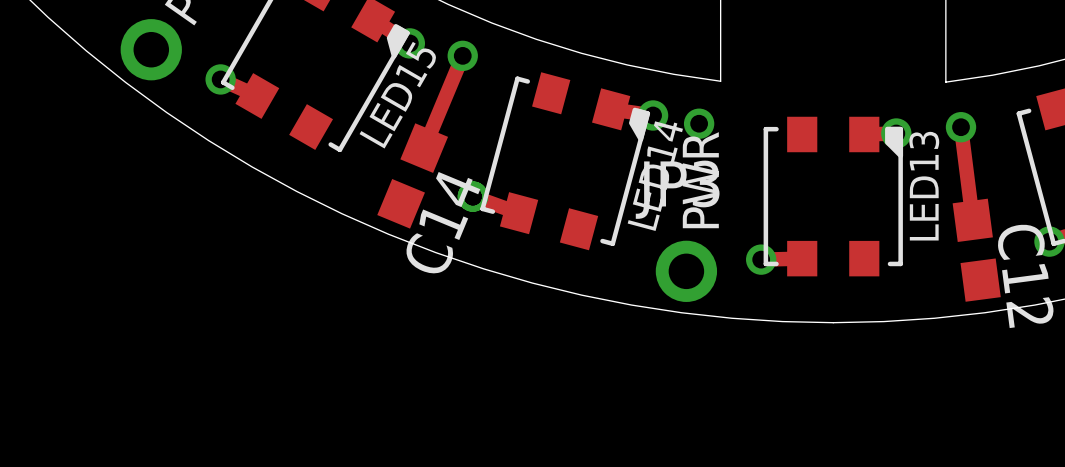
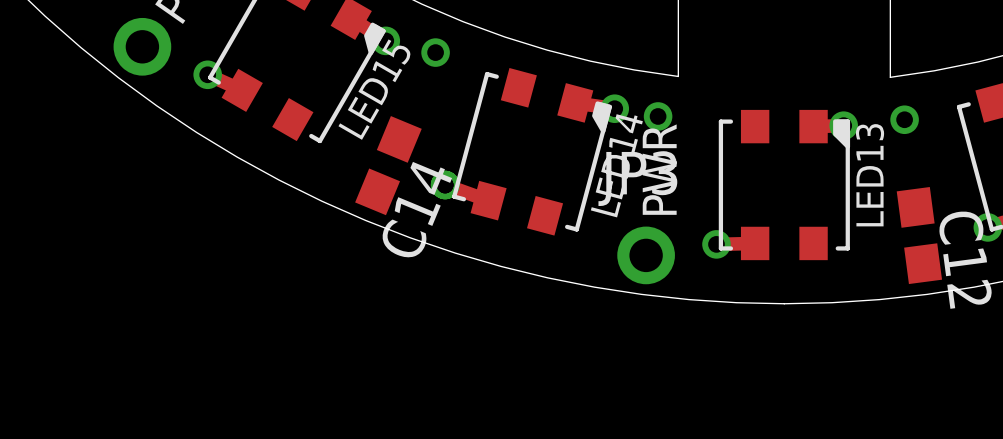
track: (462, 55) (424, 148) -> none
track: (961, 127) (972, 220) -> none

